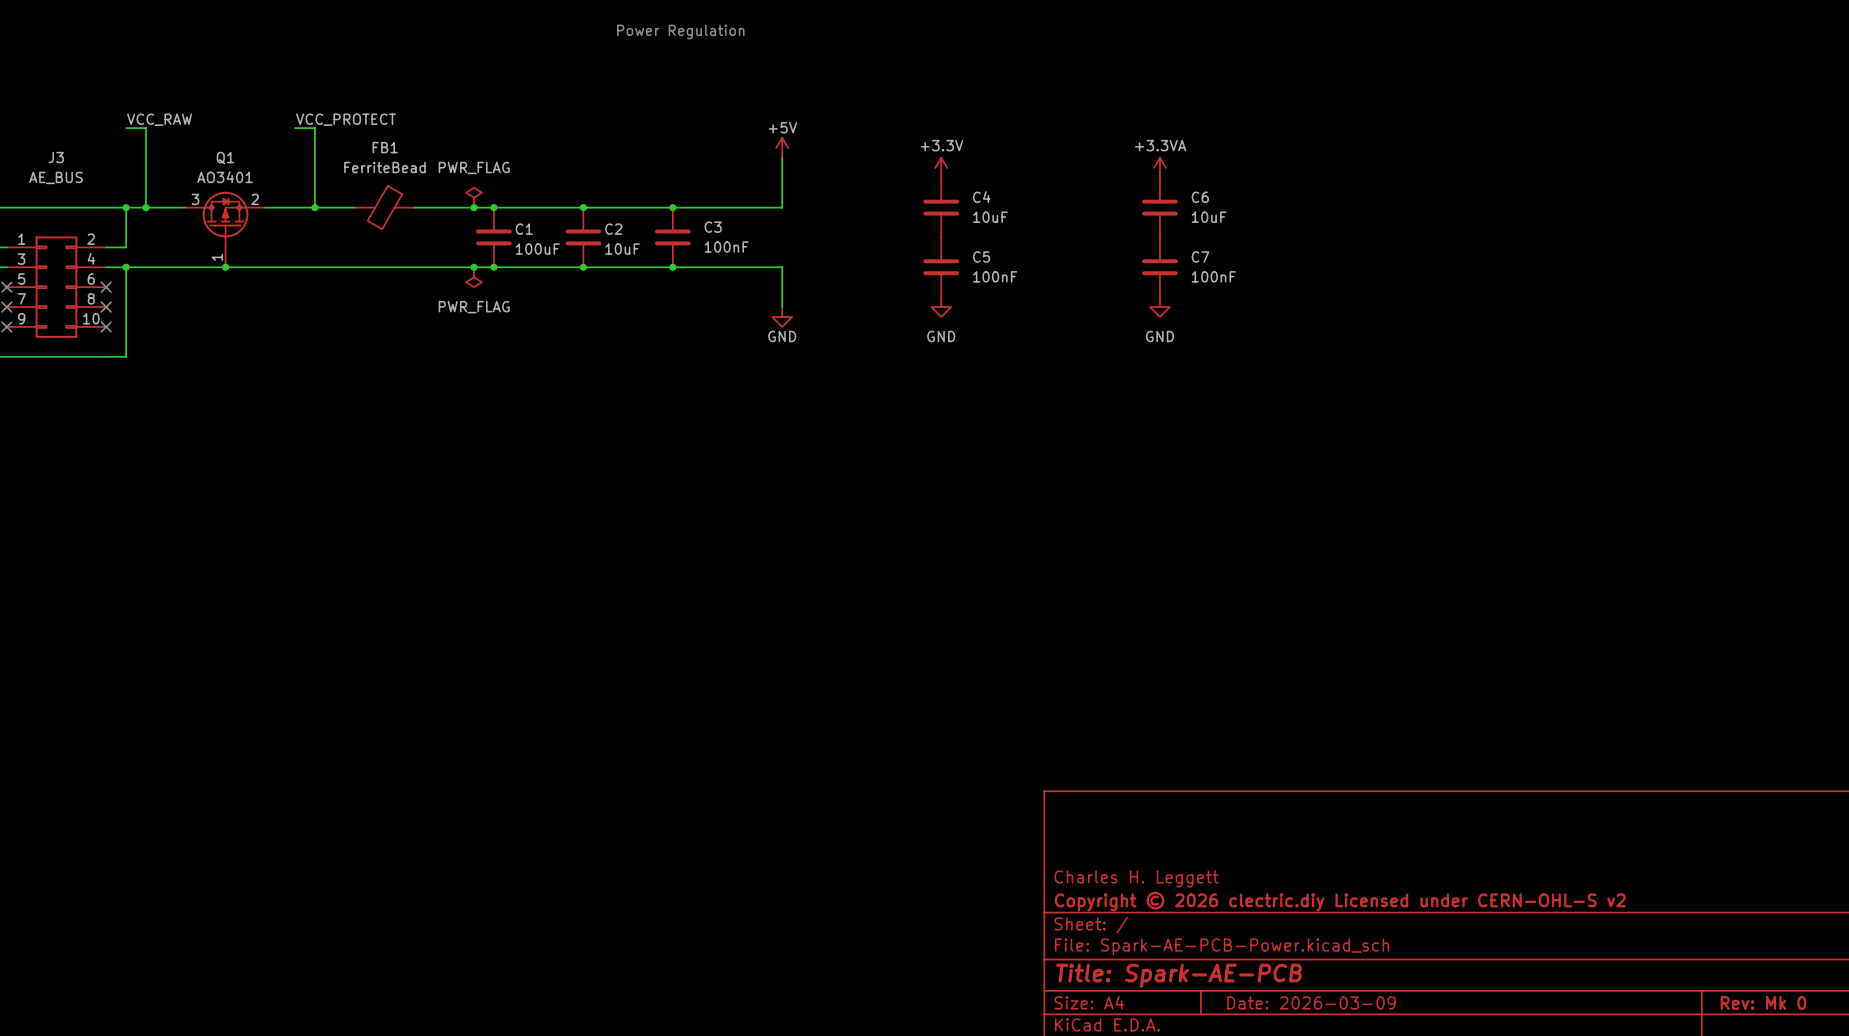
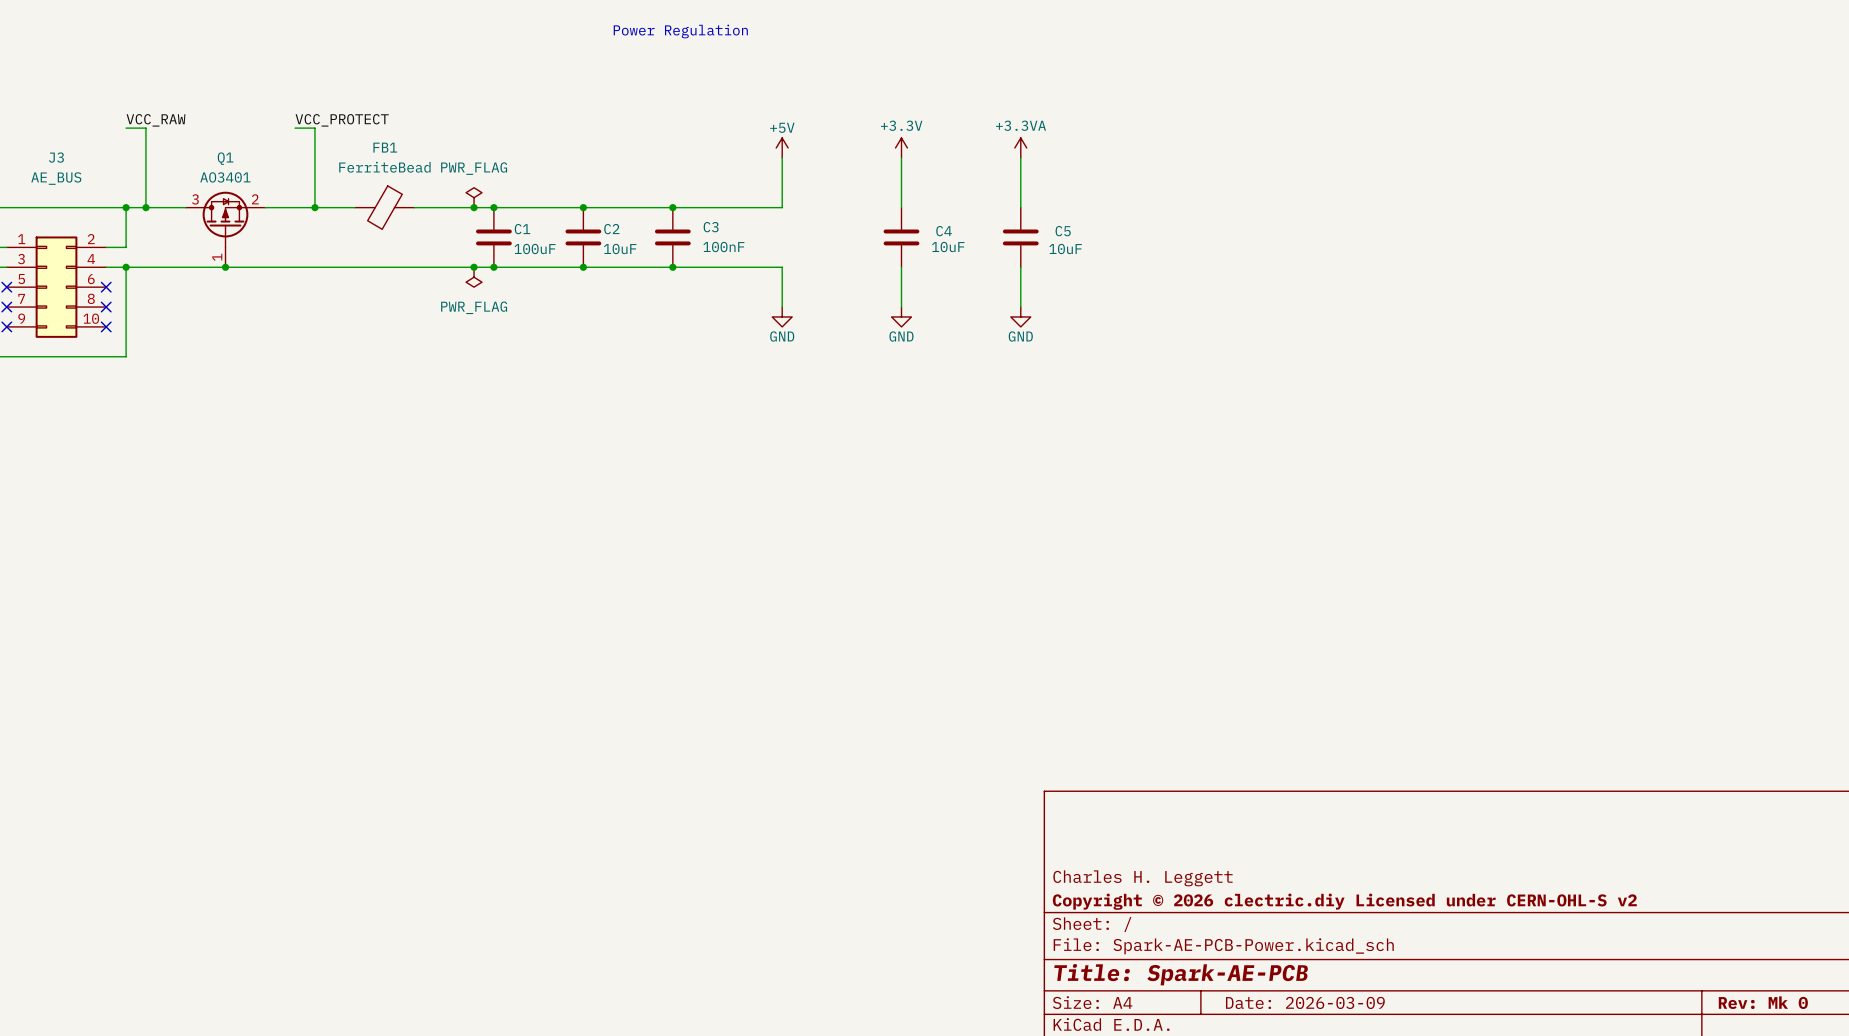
wire: none -> (901, 157) (901, 207)
wire: none -> (1020, 157) (1020, 207)
power symbol position: +3.3V (941, 167) -> +3.3V (901, 147)
power symbol position: +3.3VA (1159, 167) -> +3.3VA (1020, 147)
C4 name position: C4 (981, 197) -> C4 (944, 231)
C4 position: (941, 207) -> (901, 237)
C6: 10uF (1159, 207) -> none
C5 name position: C5 (981, 256) -> C5 (1063, 231)
wire: none -> (901, 267) (901, 307)
C5 position: (941, 267) -> (1020, 237)
wire: none -> (1020, 267) (1020, 307)
C7: 100nF (1159, 267) -> none
C5 value: 100nF (995, 276) -> 10uF (1065, 249)
power symbol: GND (941, 307) -> none
power symbol: GND (1159, 307) -> none
power symbol: none -> GND (901, 316)
power symbol: none -> GND (1020, 316)

